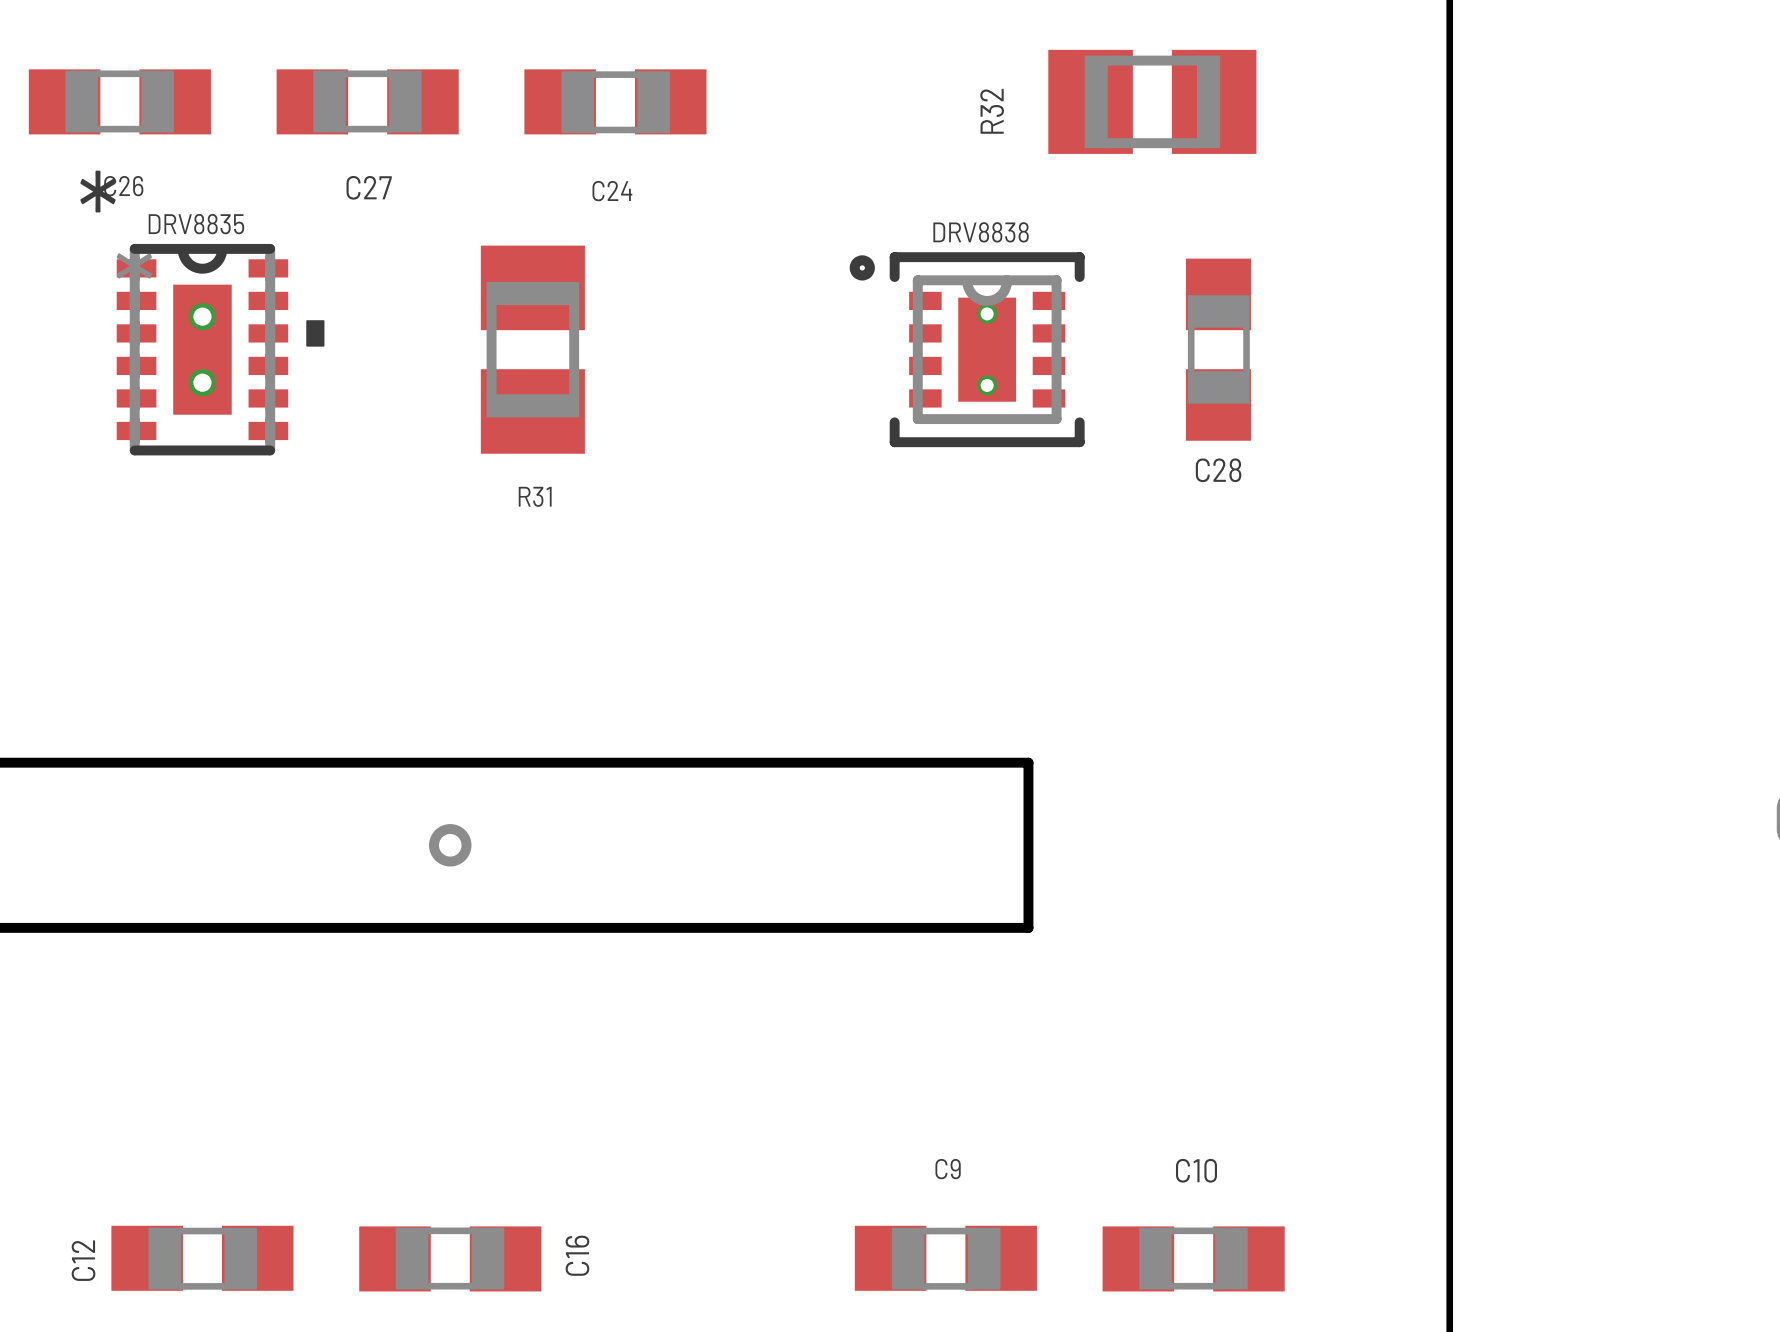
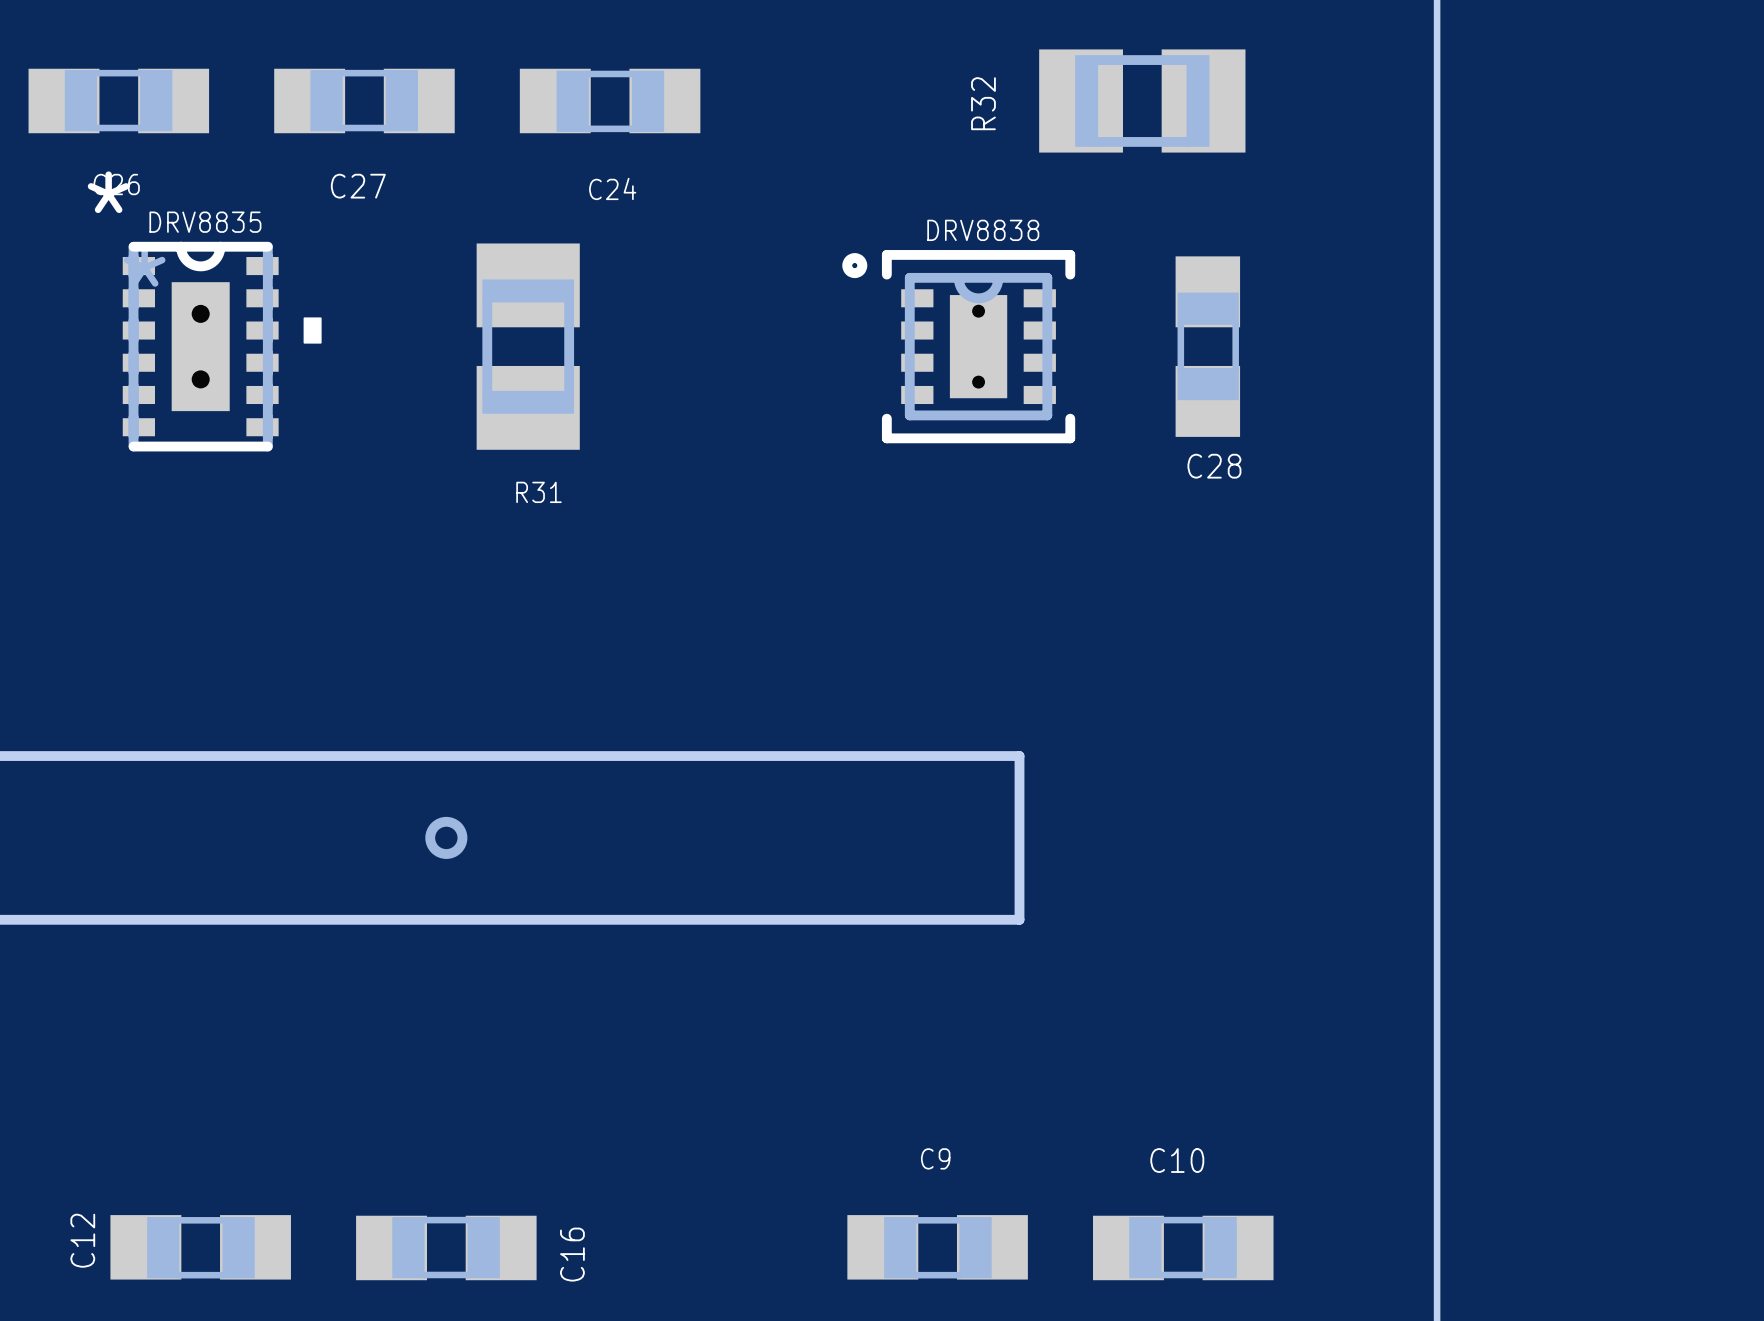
DRV8835 footprint: [116, 243, 325, 456] -> [122, 241, 322, 452]

